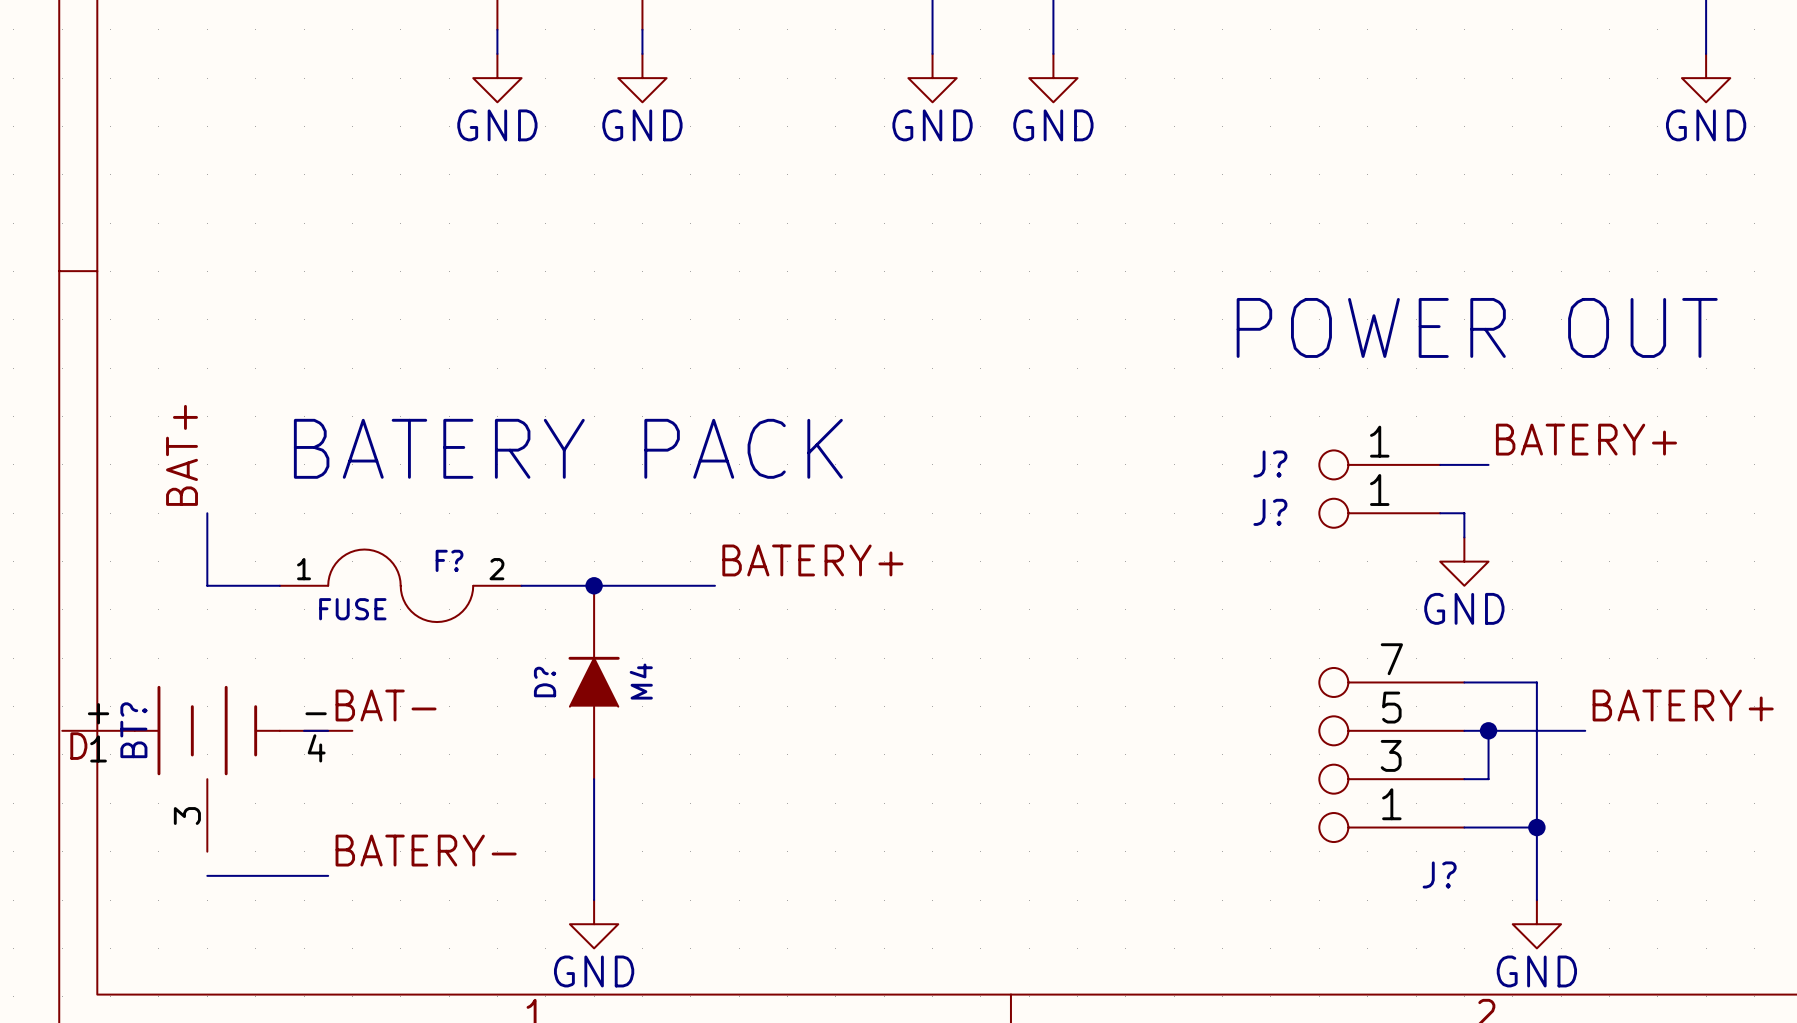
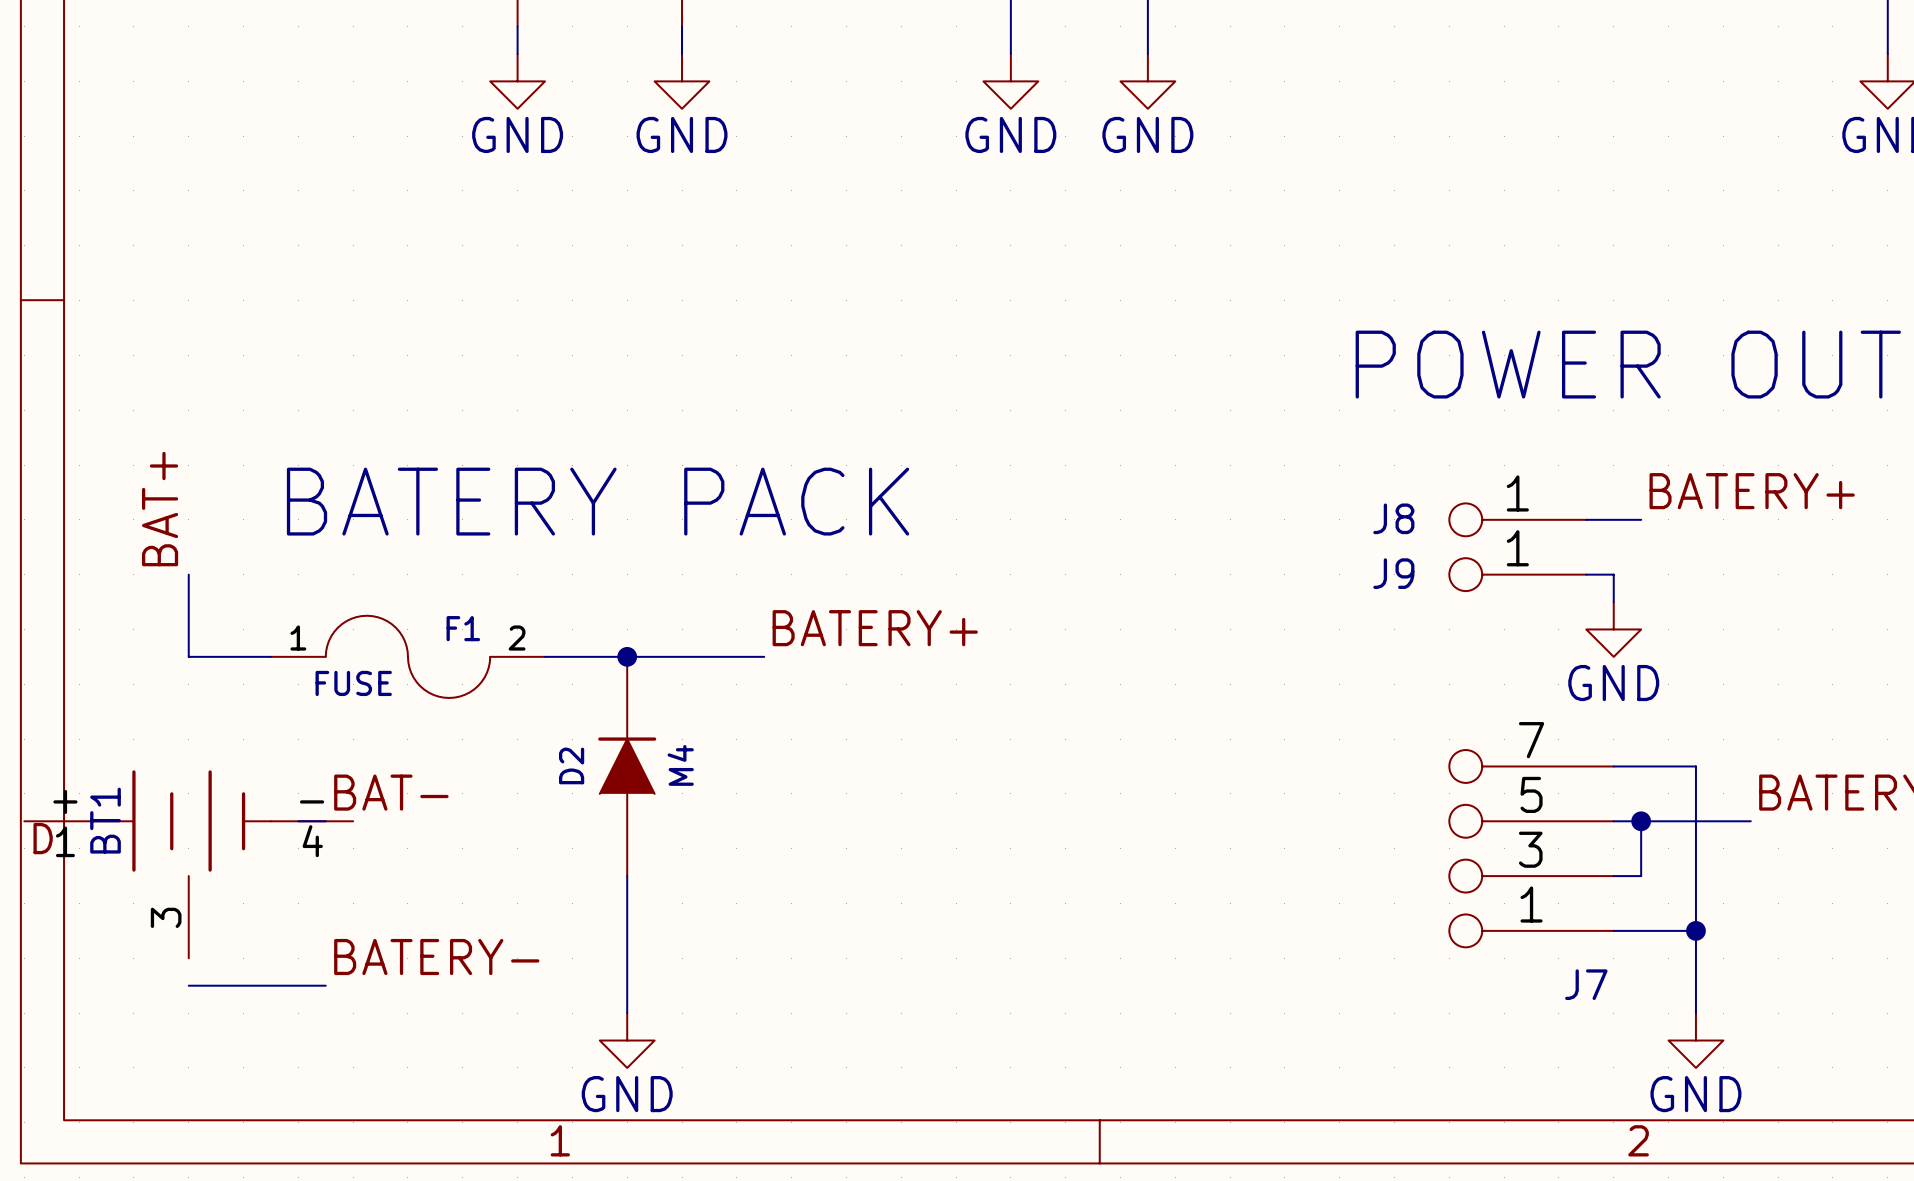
J? name: J? (1270, 464) -> J8 (1393, 518)
J? name: J? (1270, 512) -> J9 (1393, 573)
F? name: F? (449, 560) -> F1 (463, 628)
D? name: D? (545, 682) -> D2 (571, 765)
BT? name: BT? (133, 730) -> BT1 (105, 820)
J? name: J? (1439, 874) -> J7 (1586, 984)

